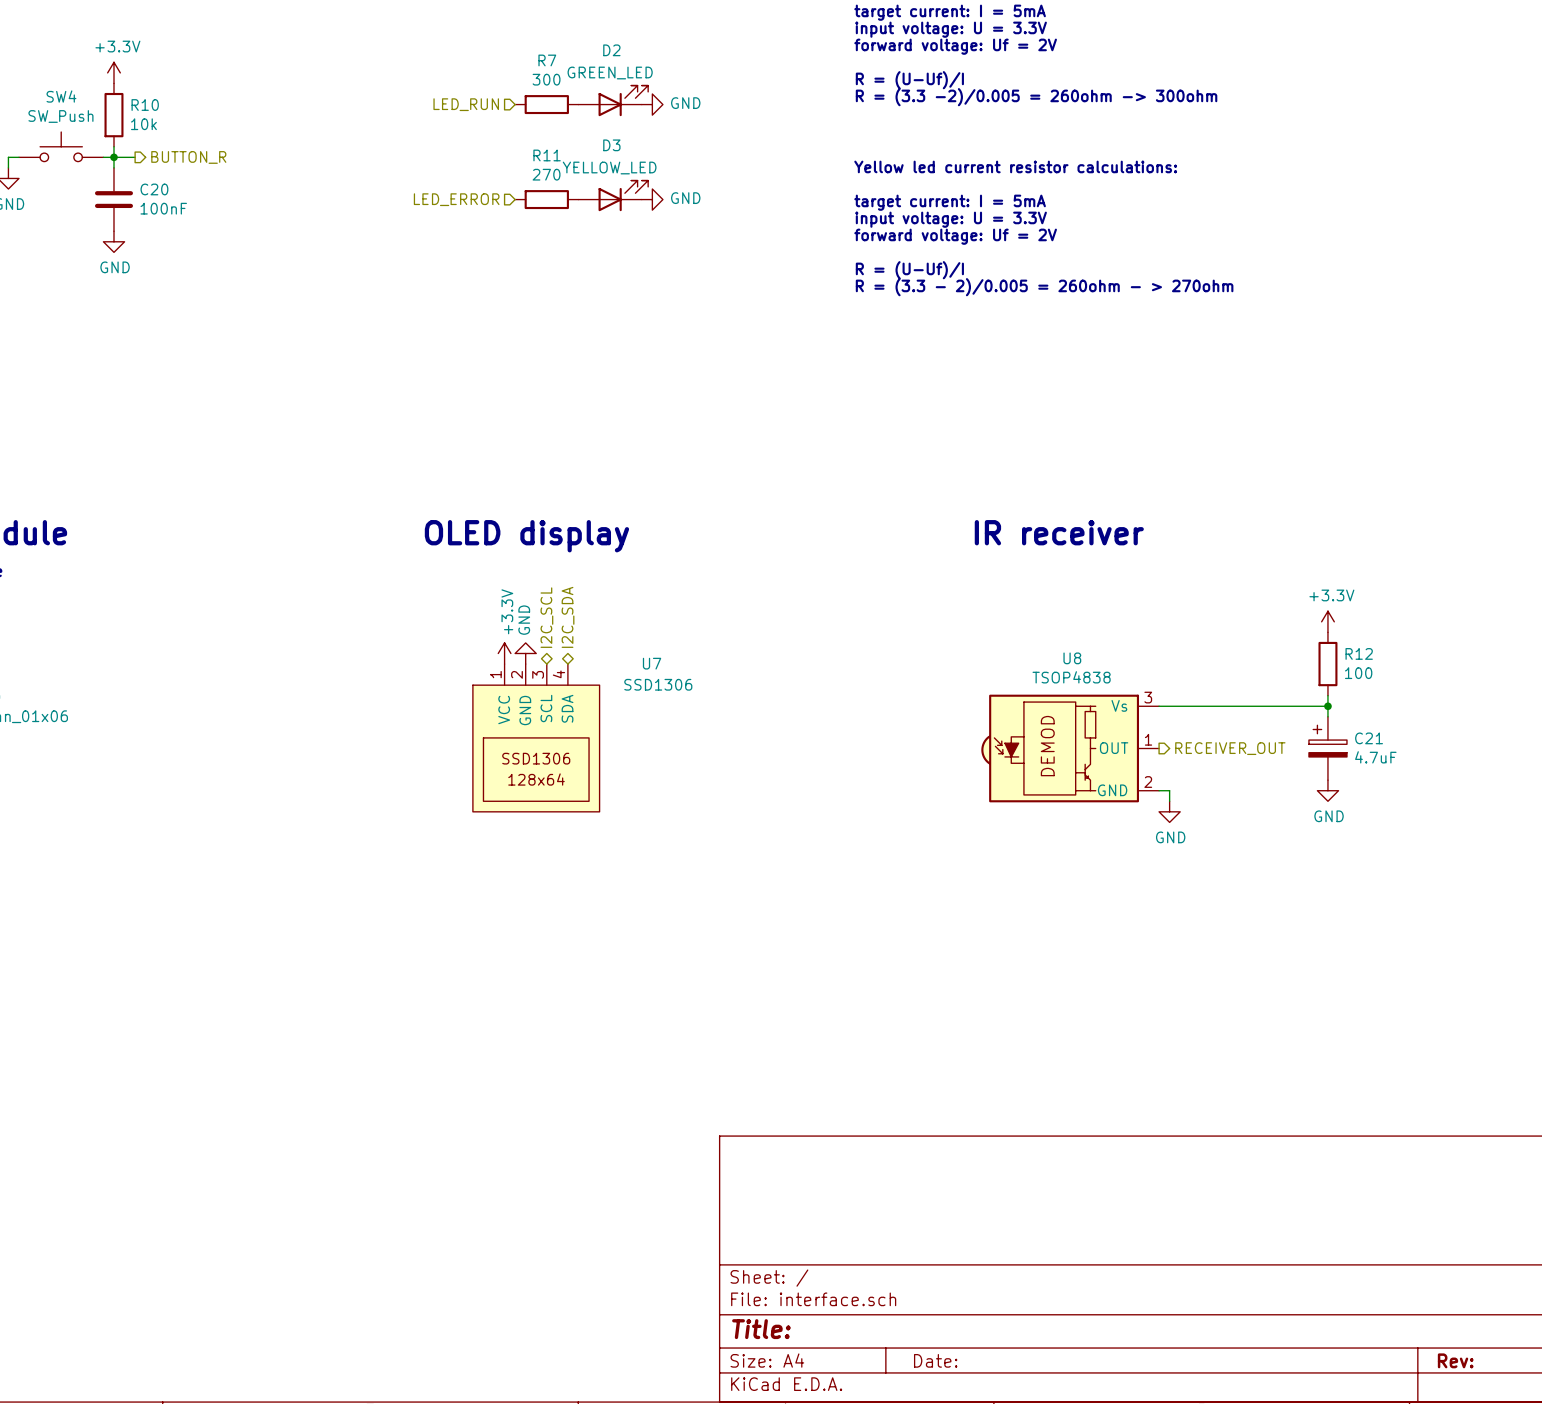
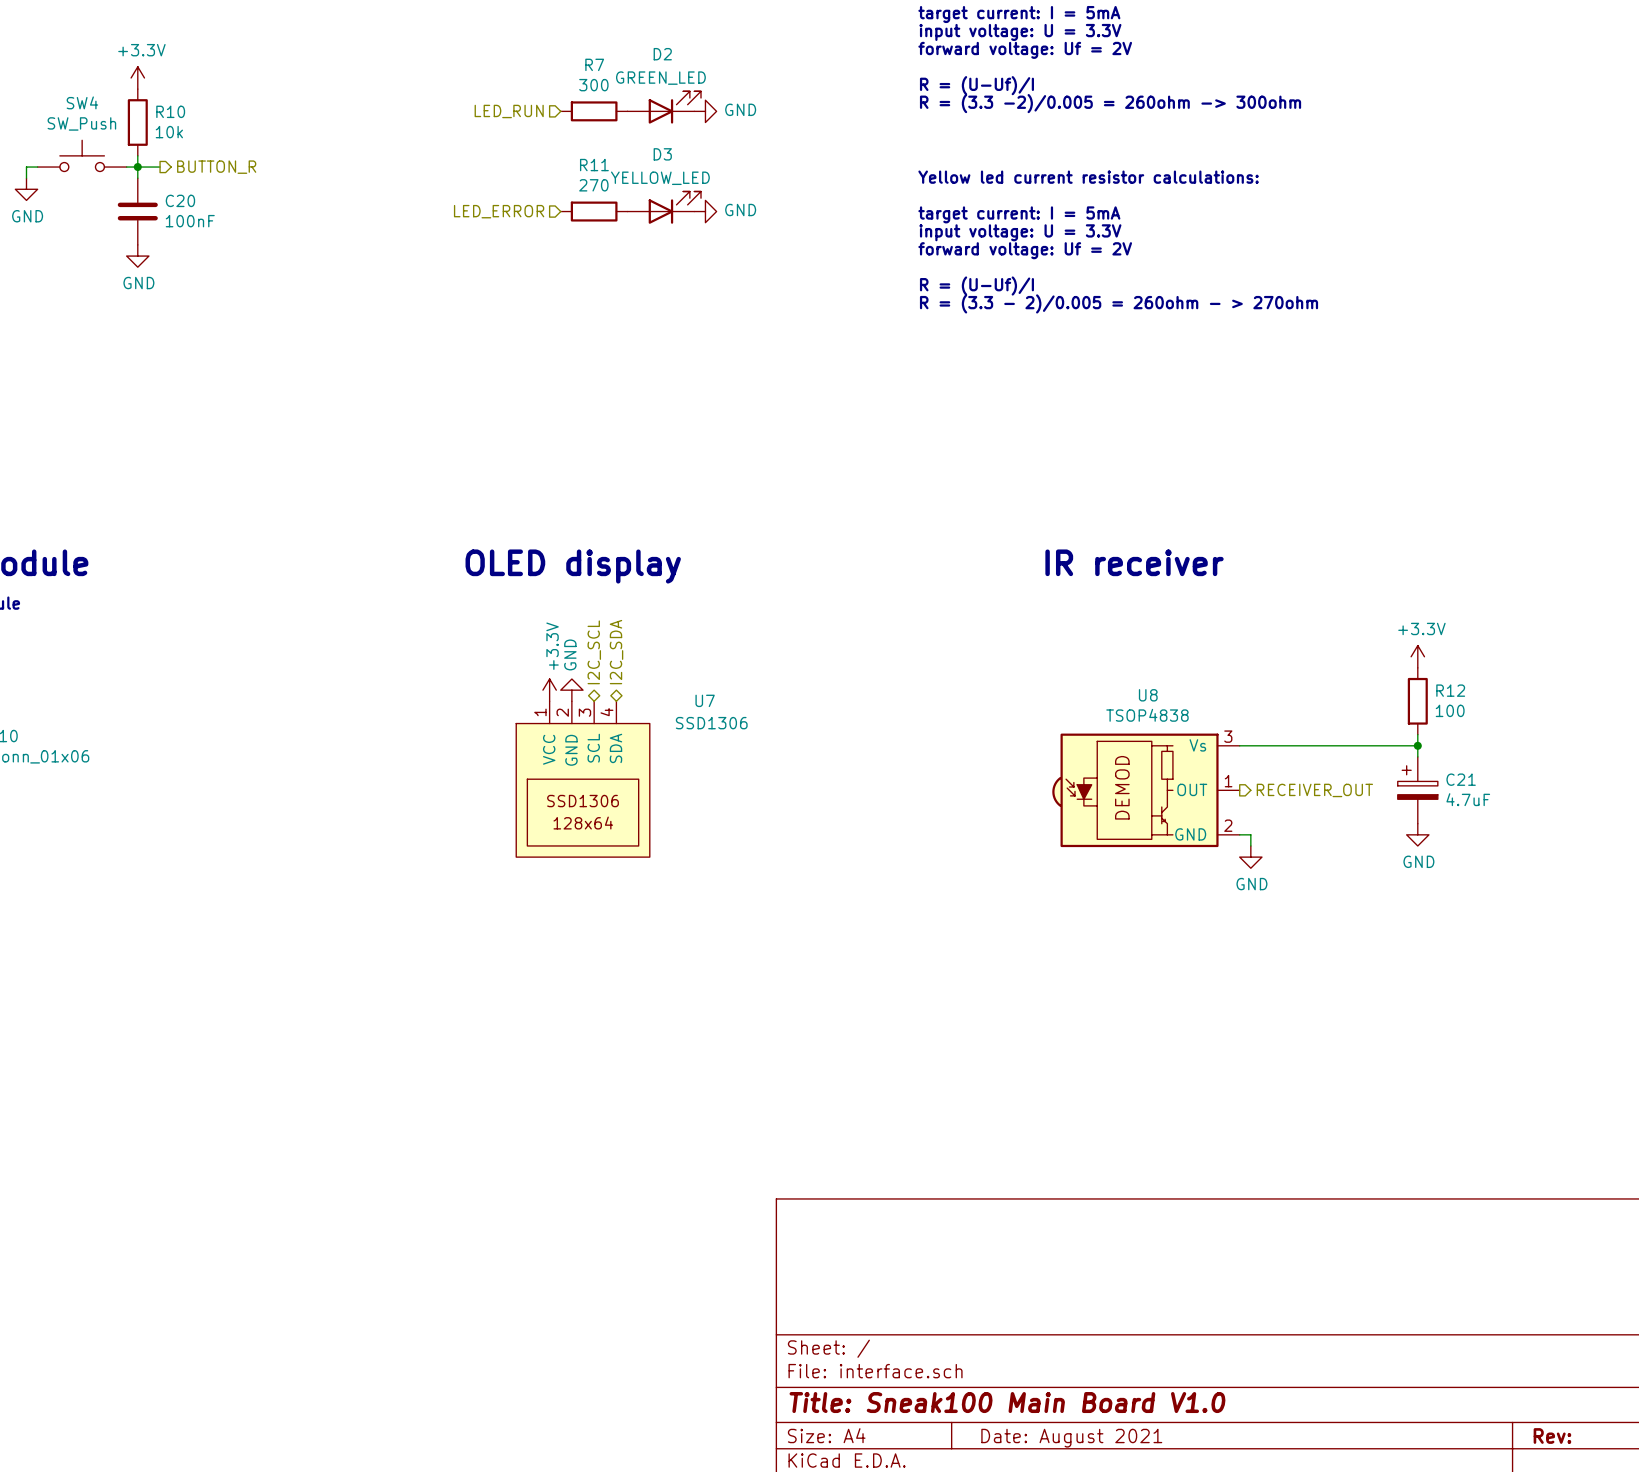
title block: Title: (761, 1329) -> Title: Sneak100 Main Board V1.0 (1007, 1402)
title block: Date: (935, 1360) -> Date: August 2021 (1071, 1438)

